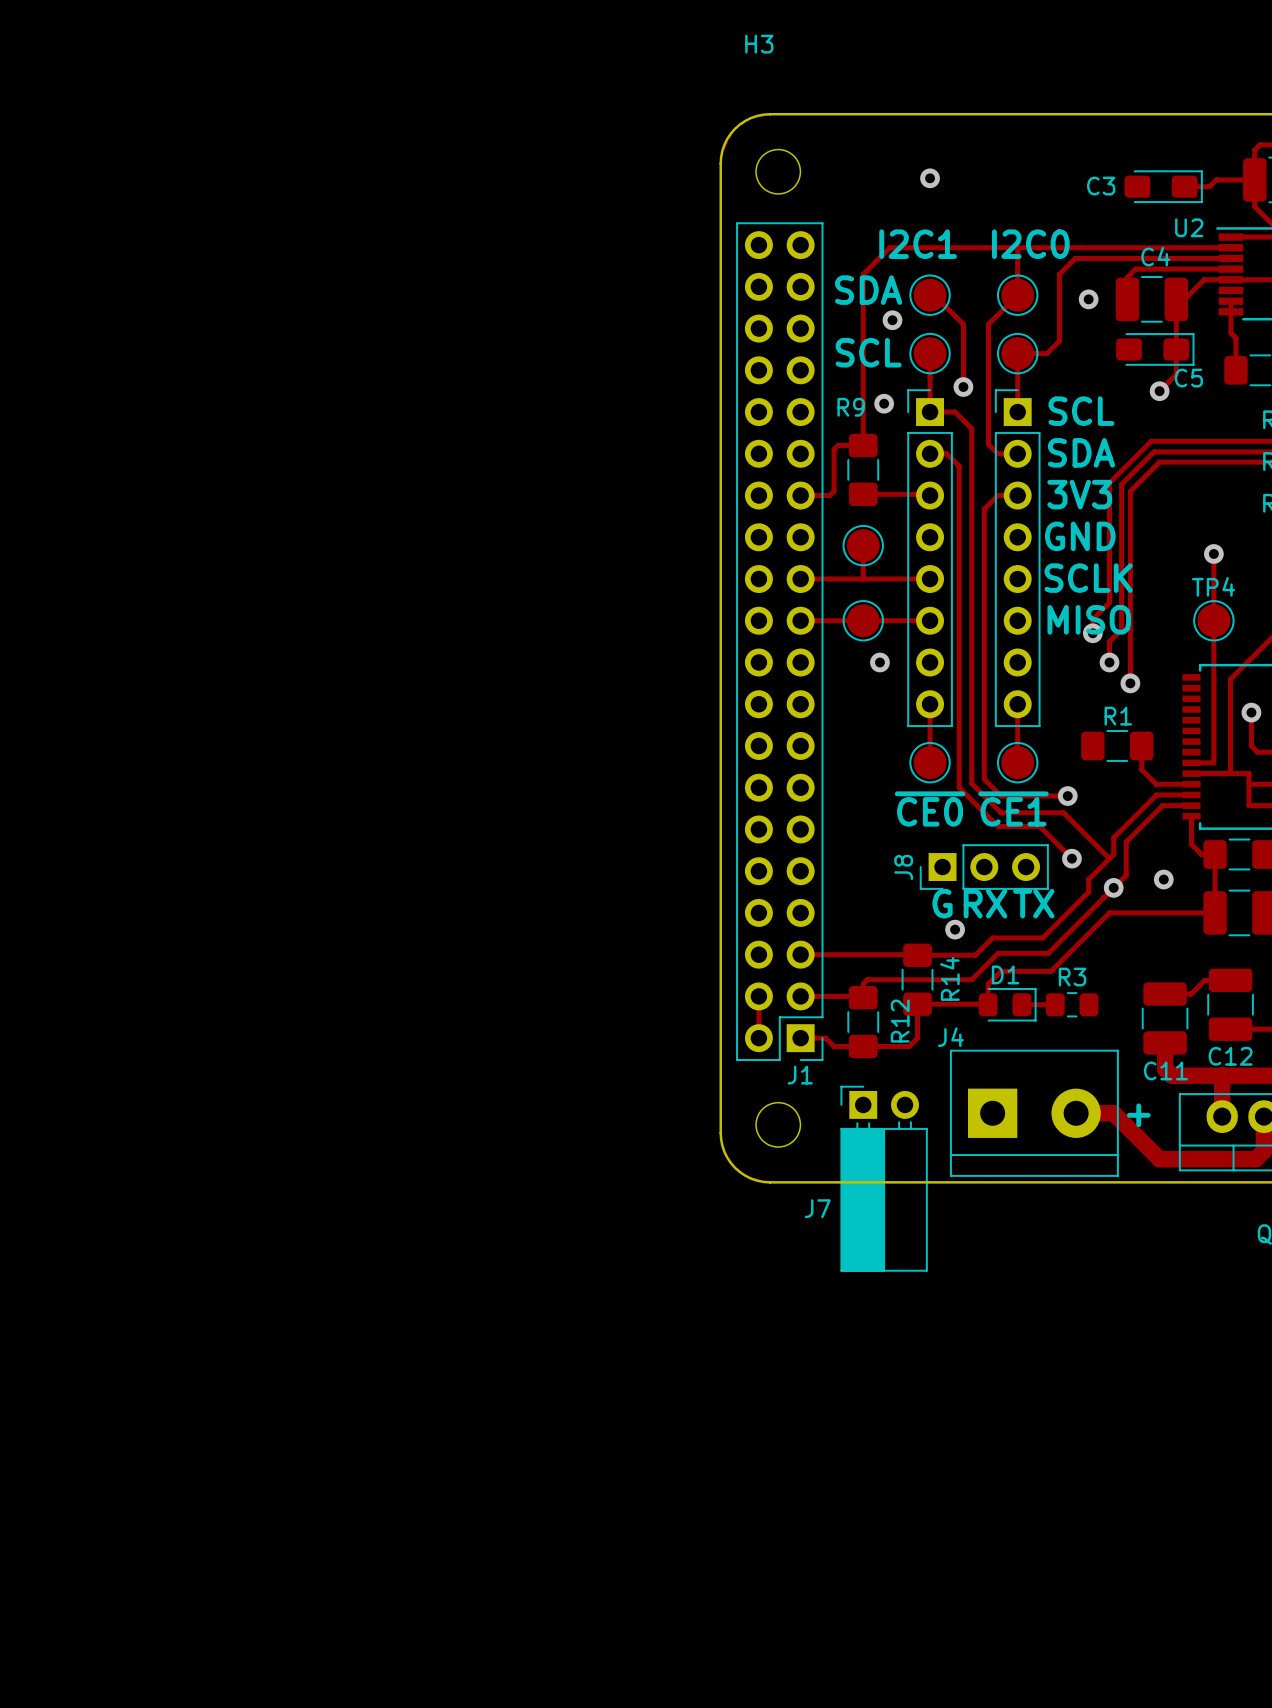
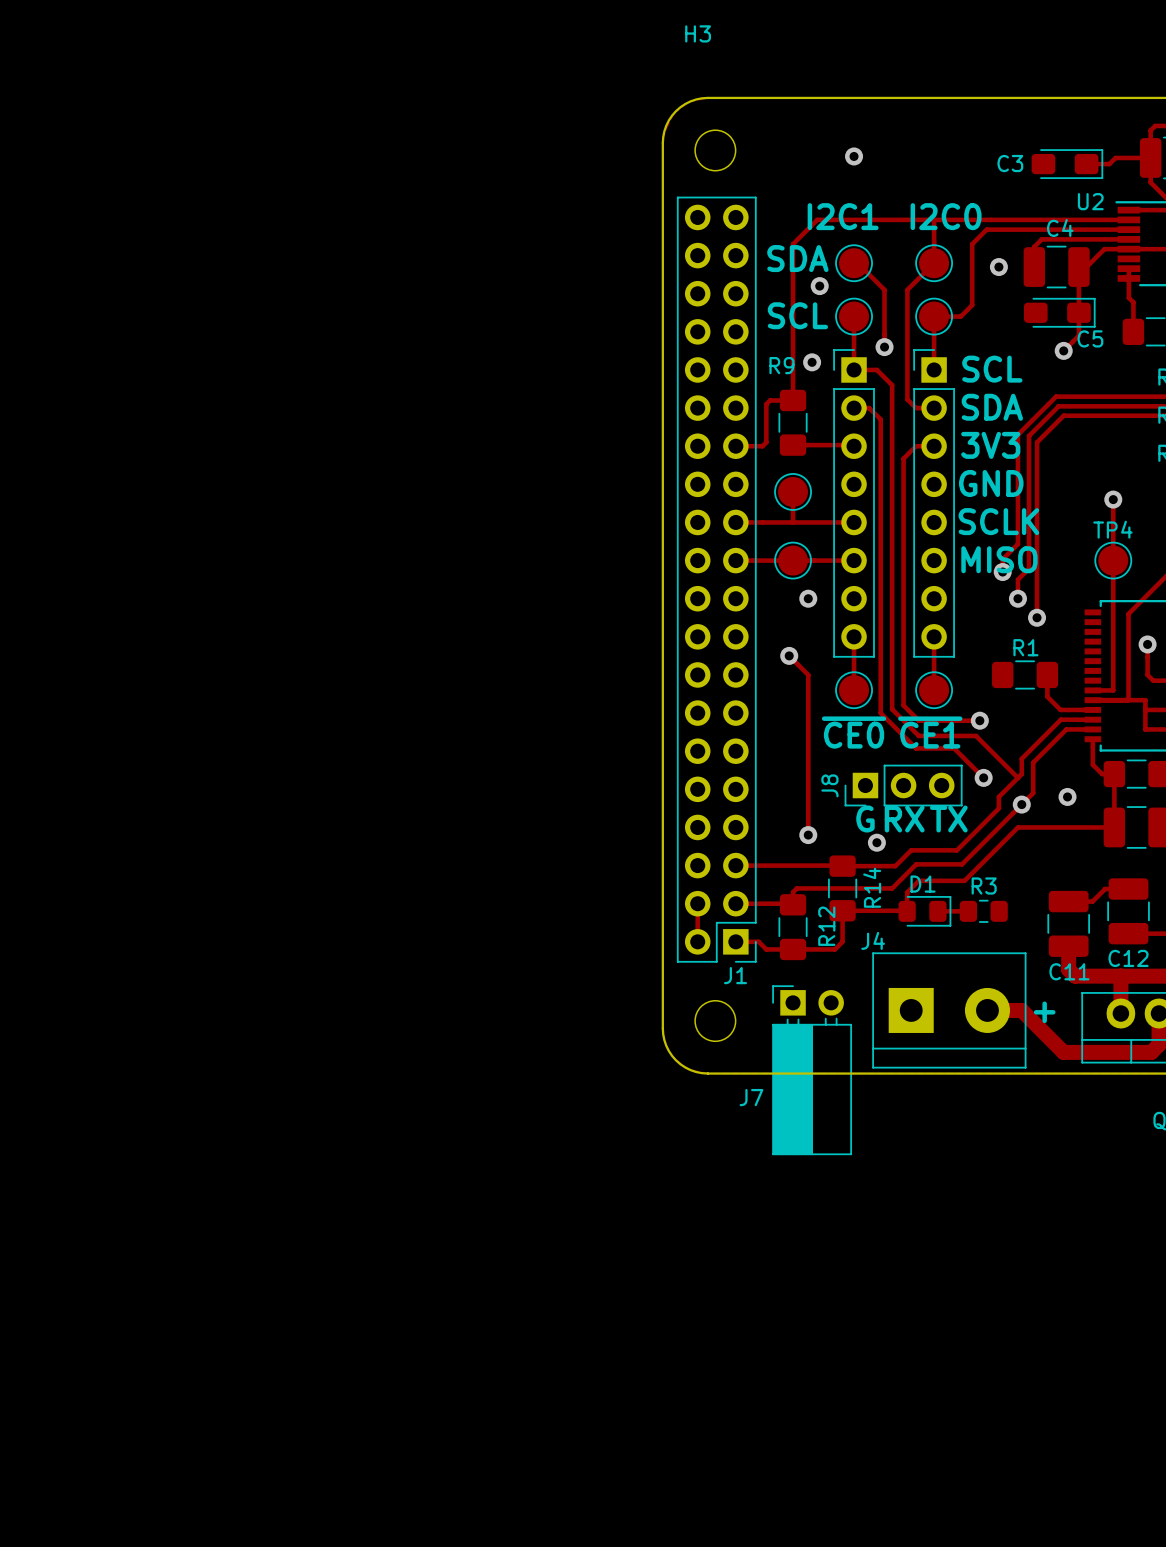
track: none -> (789, 655) (808, 674) (808, 835)
via: none -> (789, 655)
via: none -> (808, 835)

